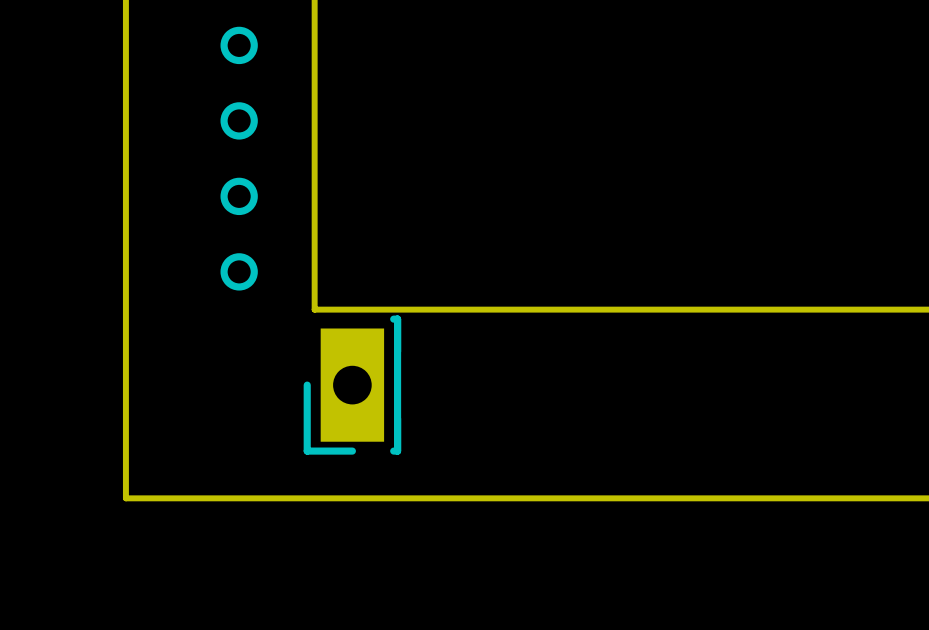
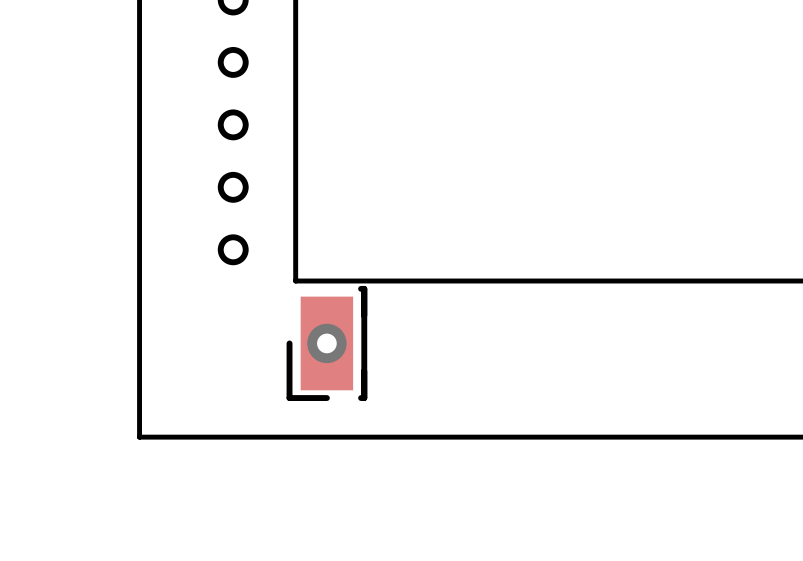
part footprint: [303, 315, 402, 455] -> [286, 285, 368, 401]
via: none -> (326, 343)

